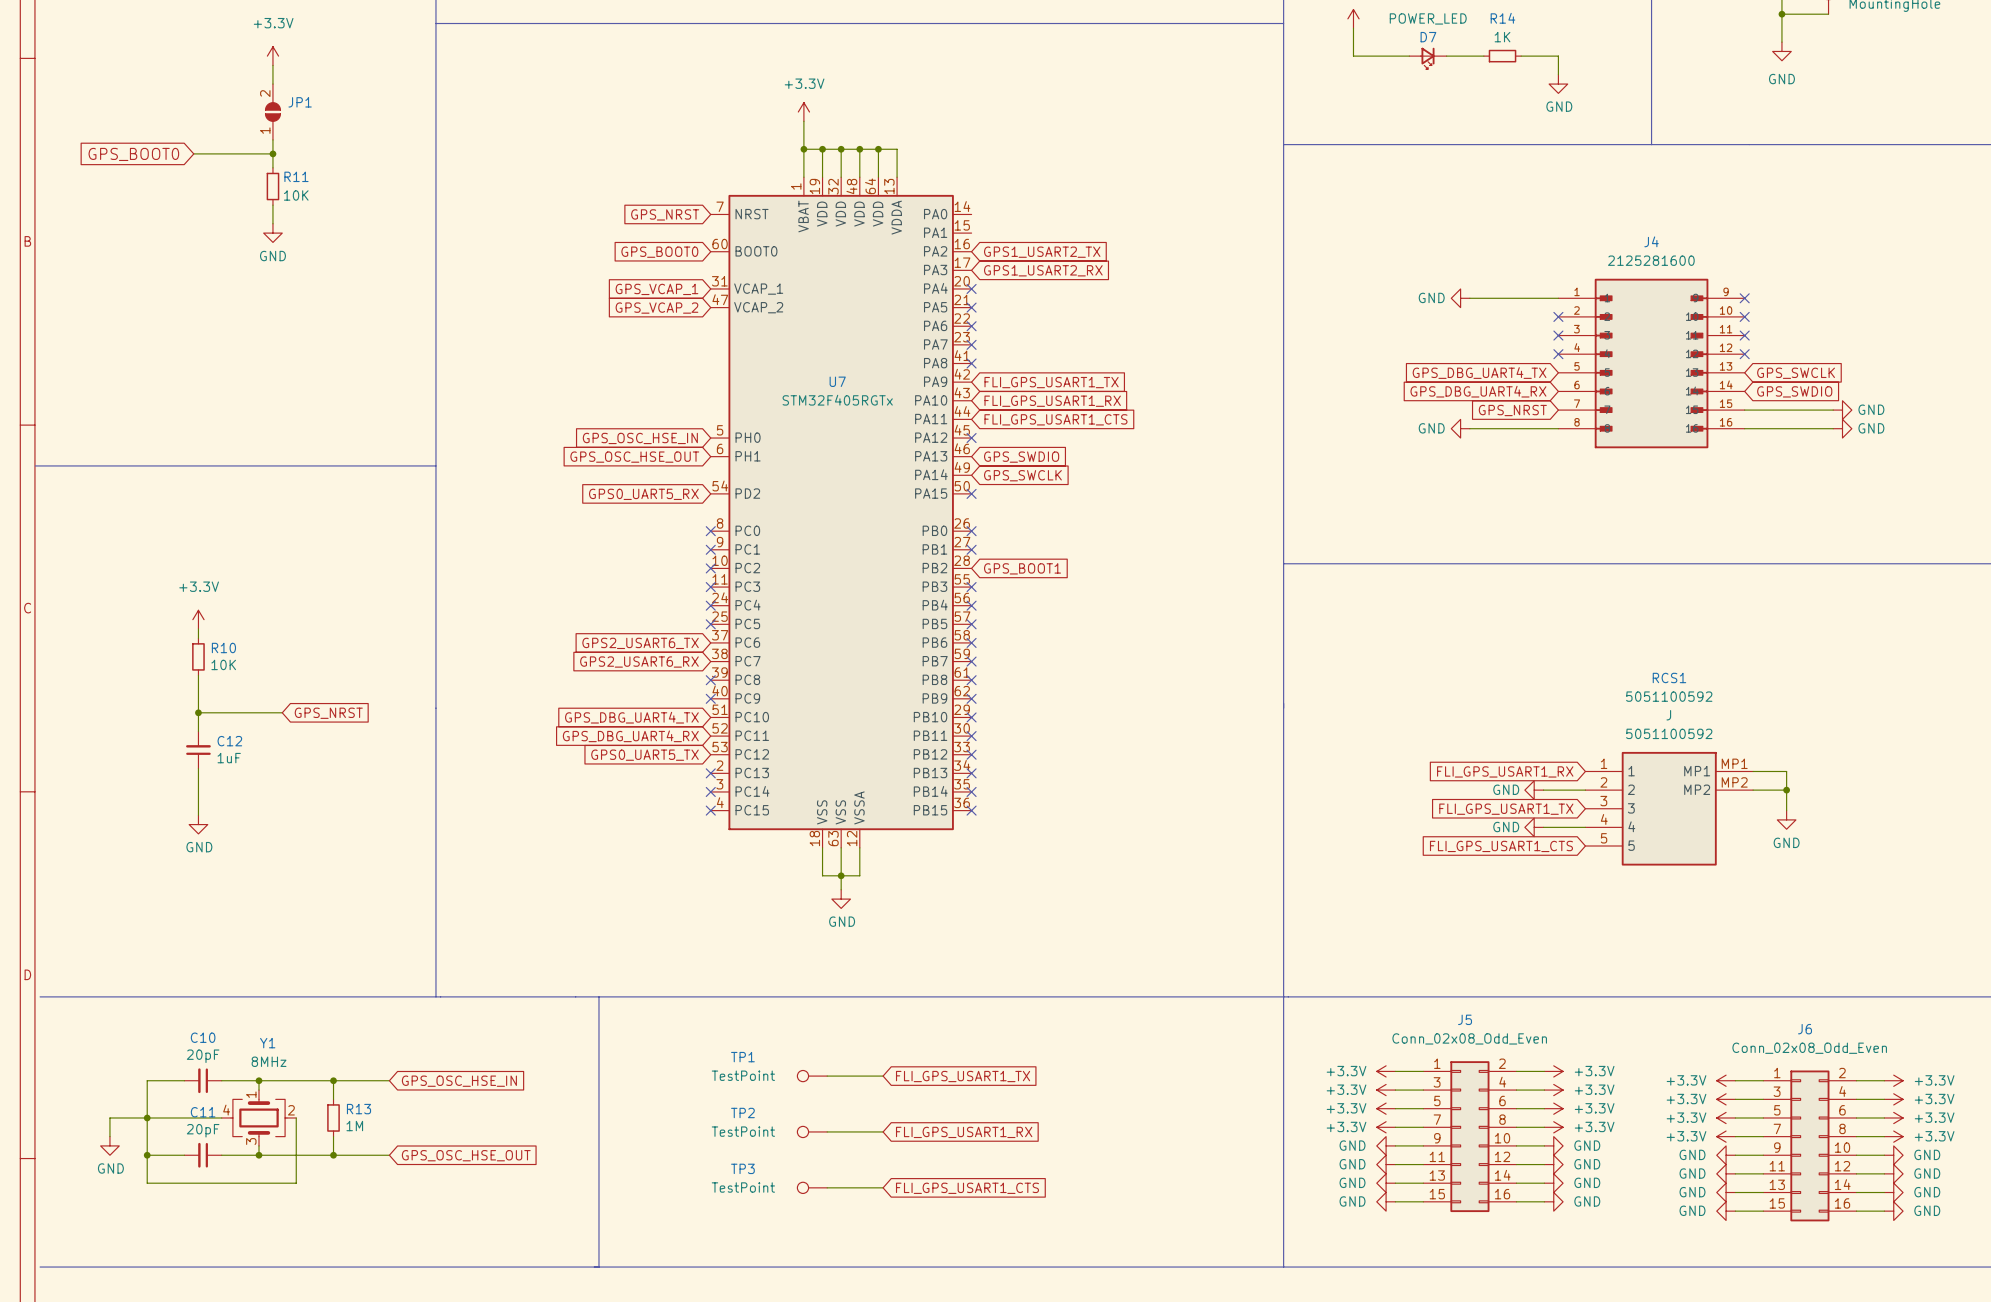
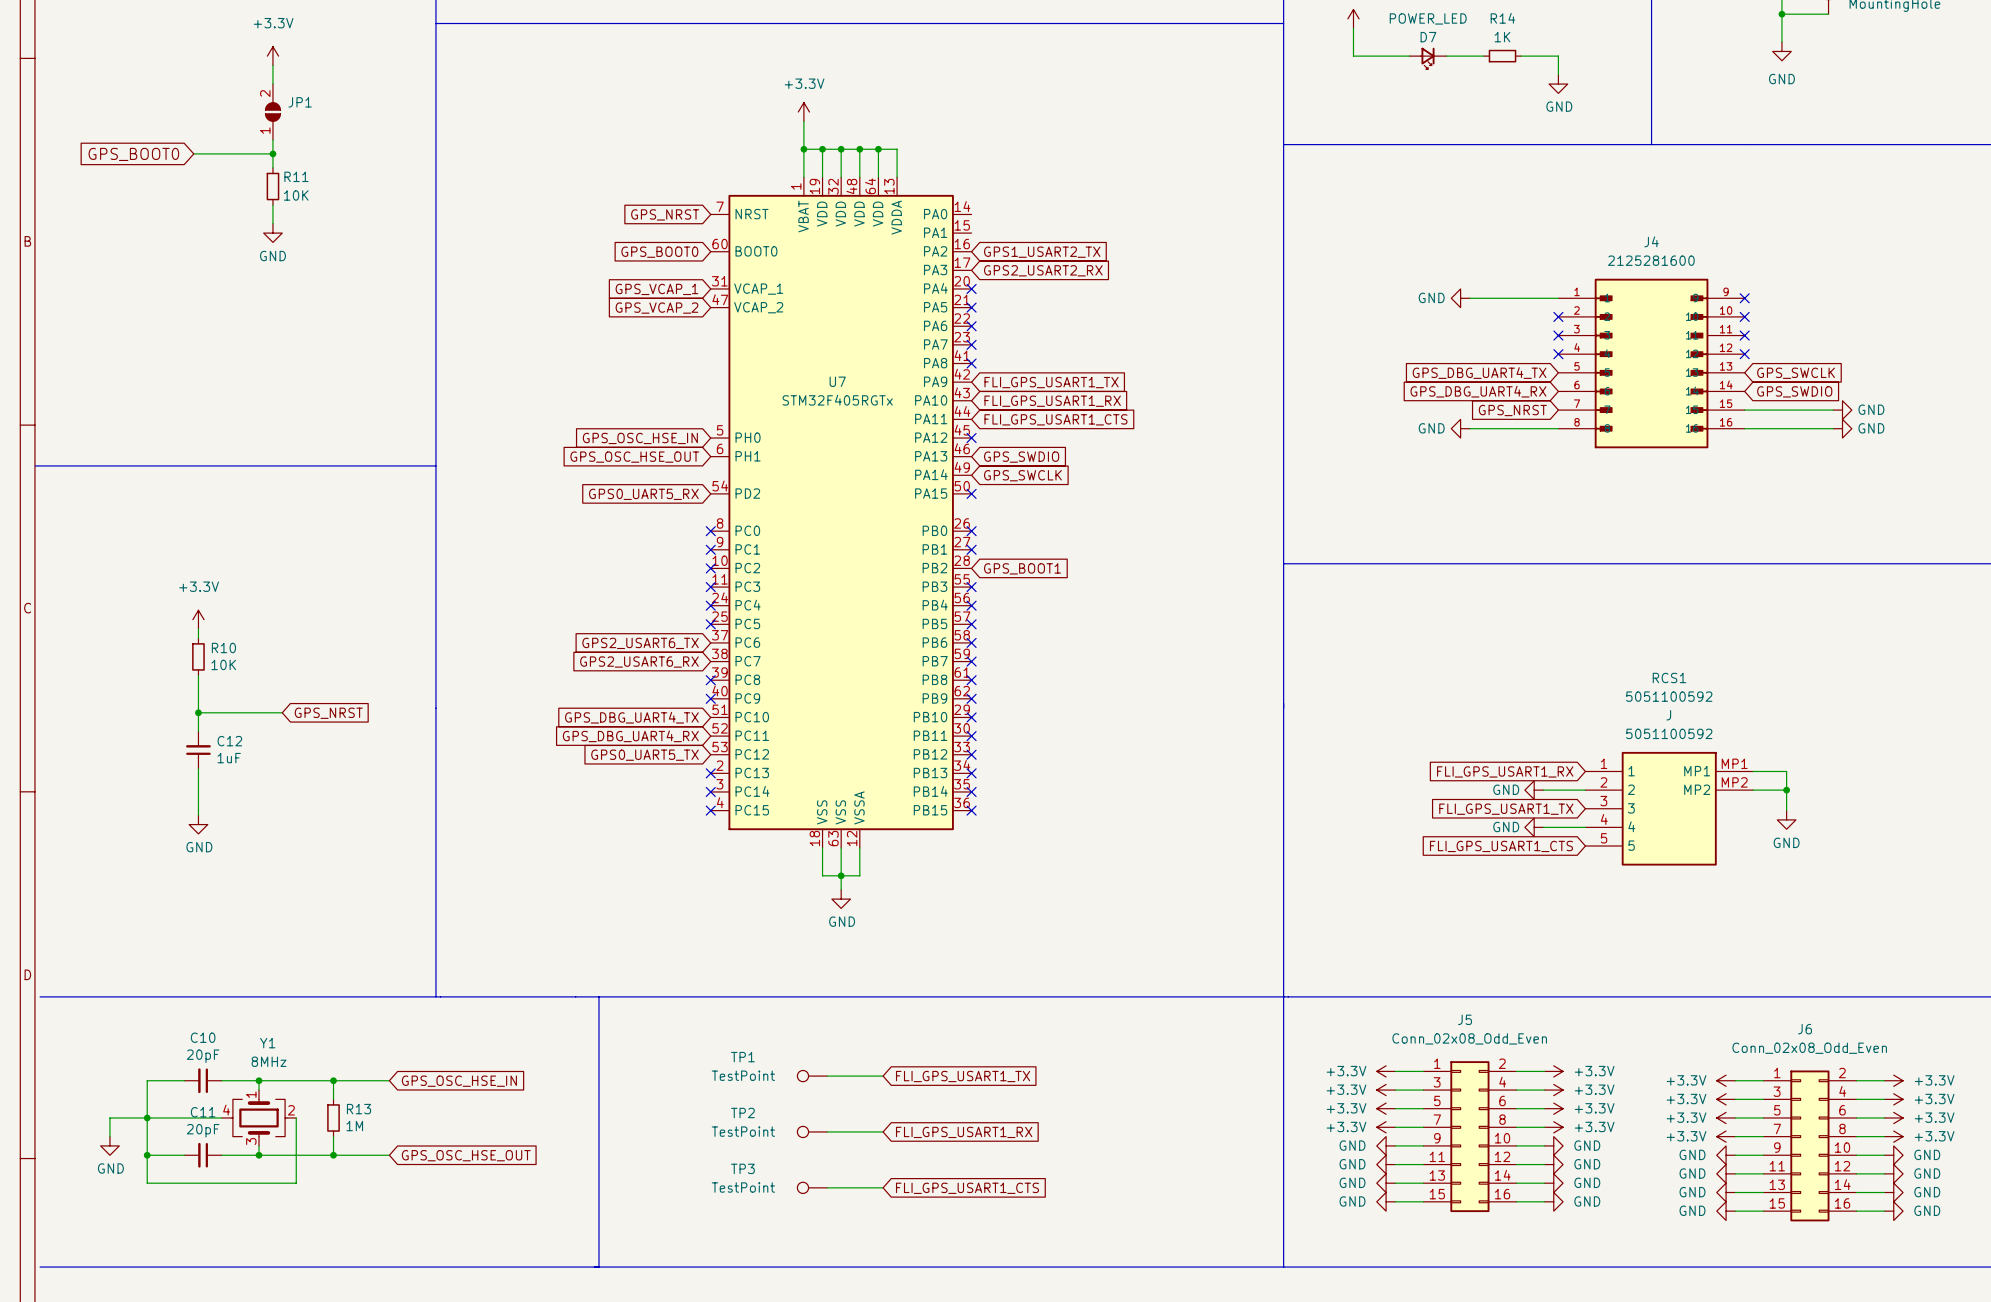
global label: GPS1_USART2_RX (1043, 270) -> GPS2_USART2_RX (1043, 270)

